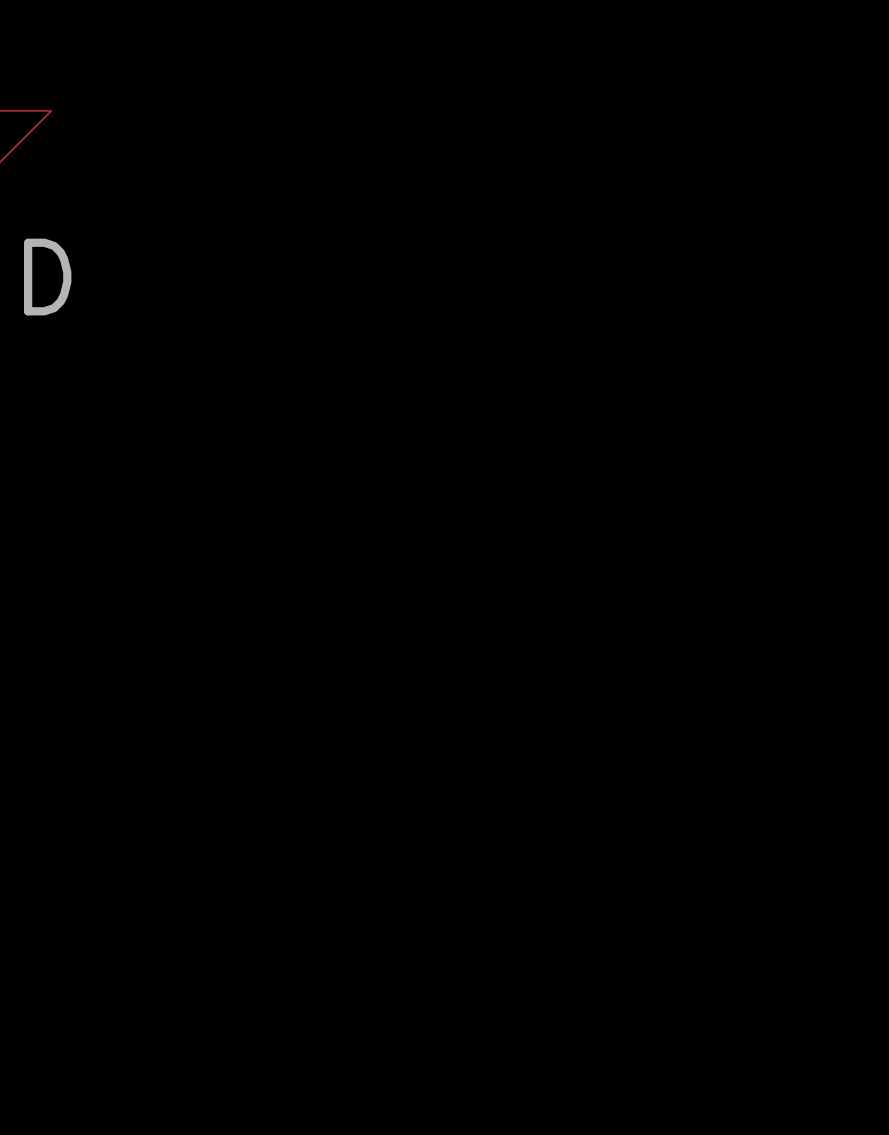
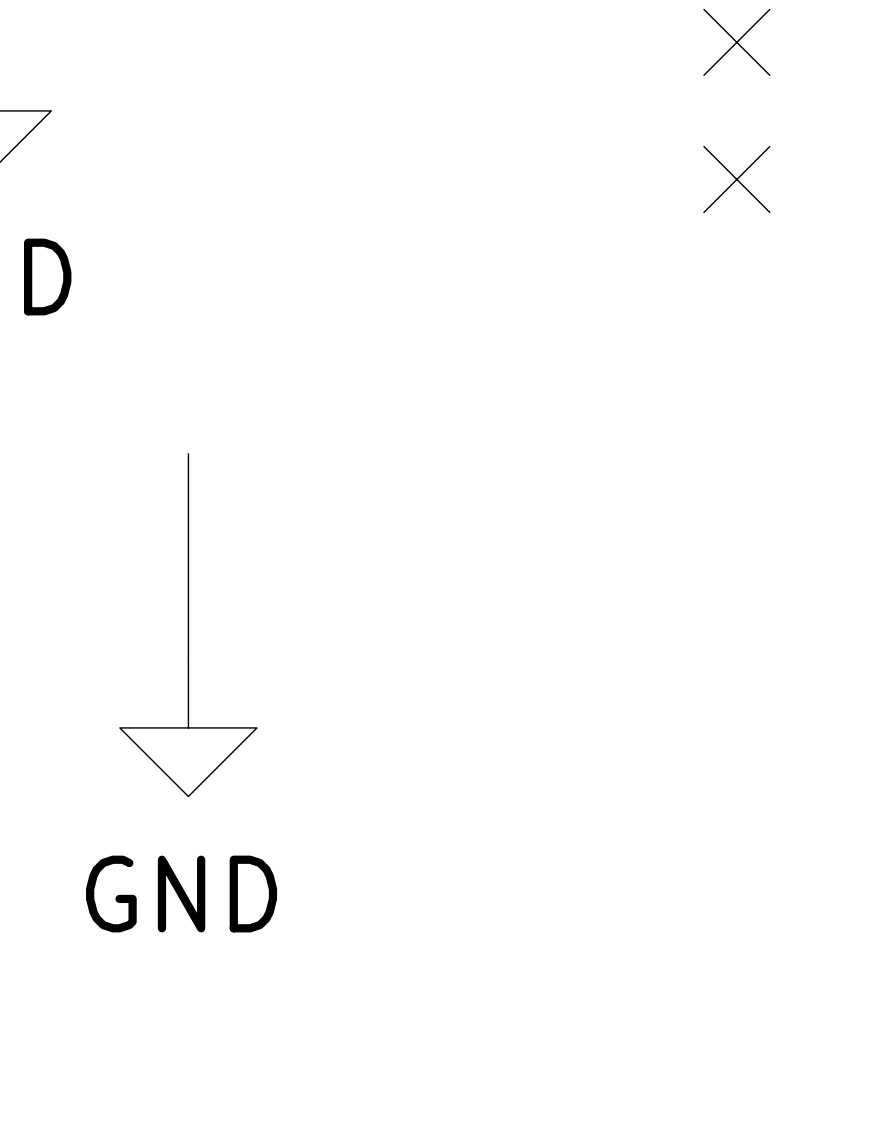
no-connect mark: none -> (736, 42)
no-connect mark: none -> (736, 179)
wire: none -> (188, 453) (188, 659)
power symbol: none -> GND (188, 727)

